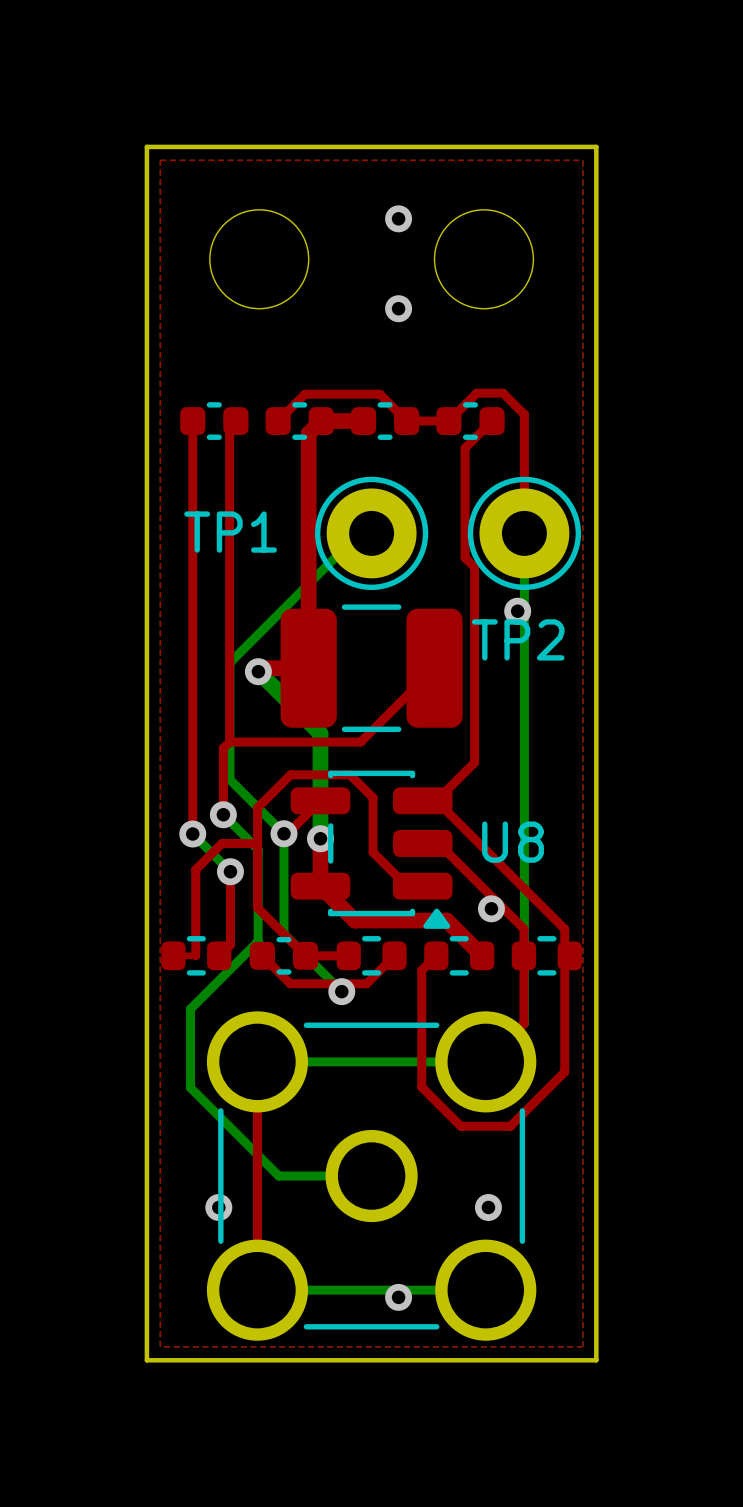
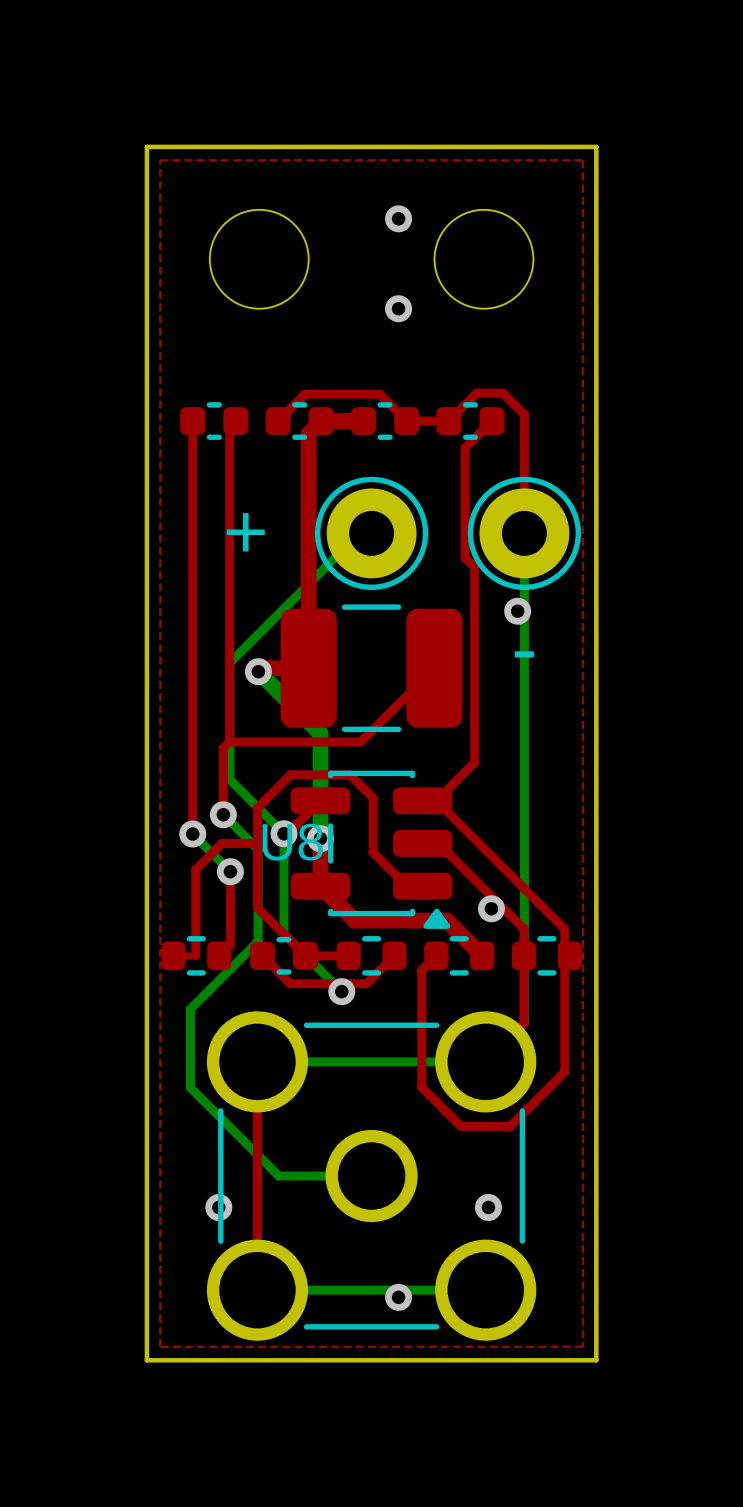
text: TP1 (230, 532) -> + (245, 532)
text: TP2 (518, 639) -> - (524, 654)
text position: U8 (513, 842) -> U8 (292, 842)

